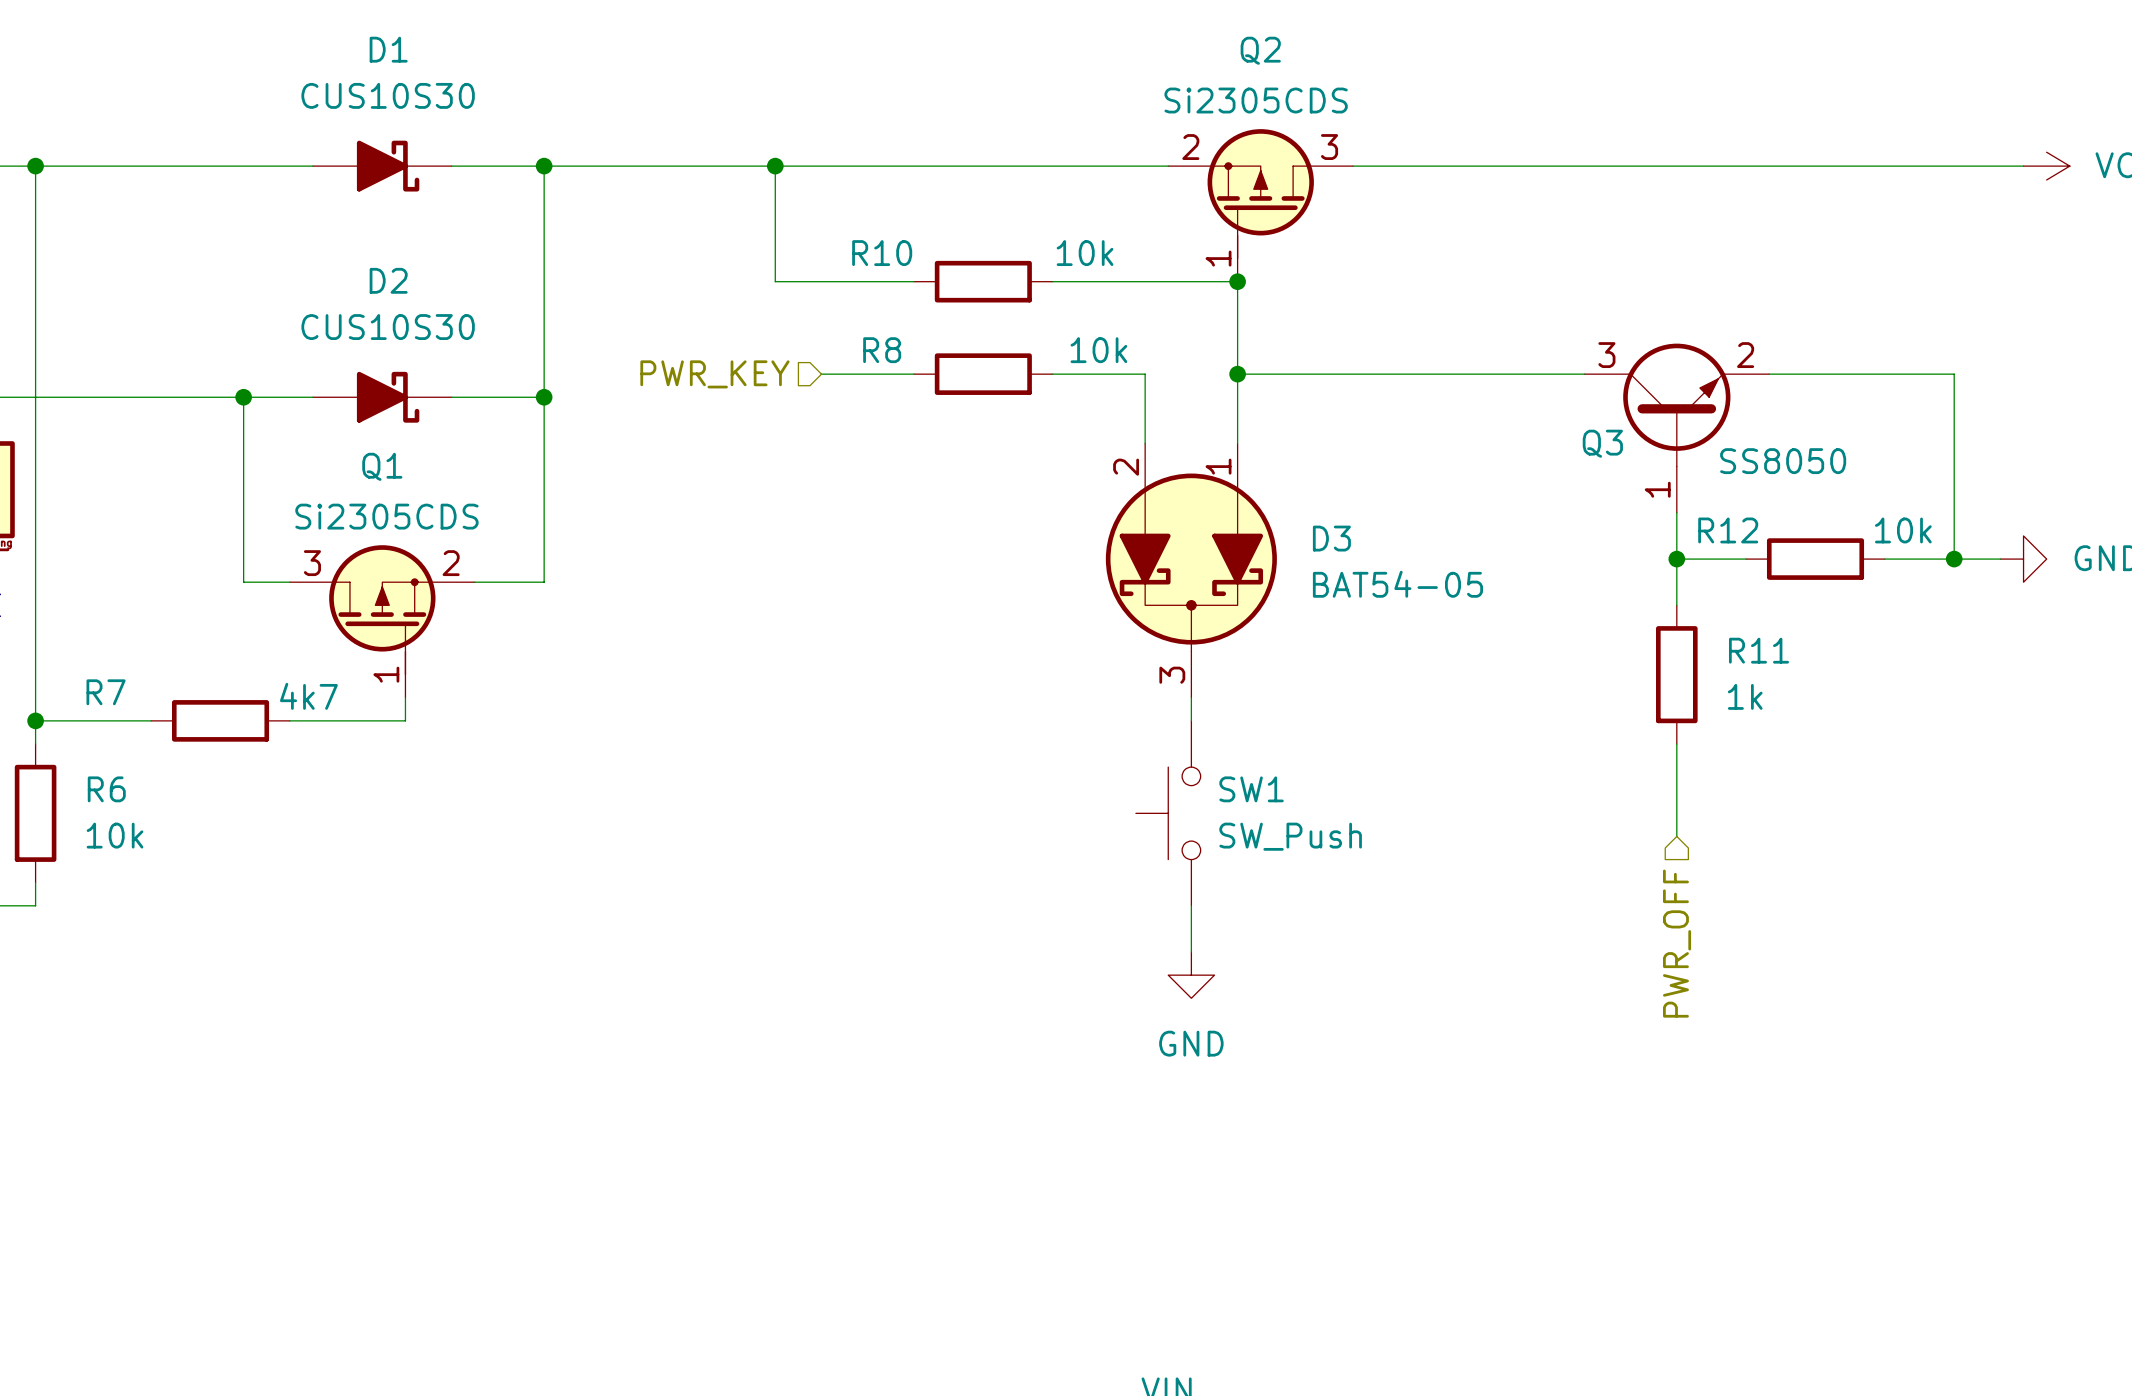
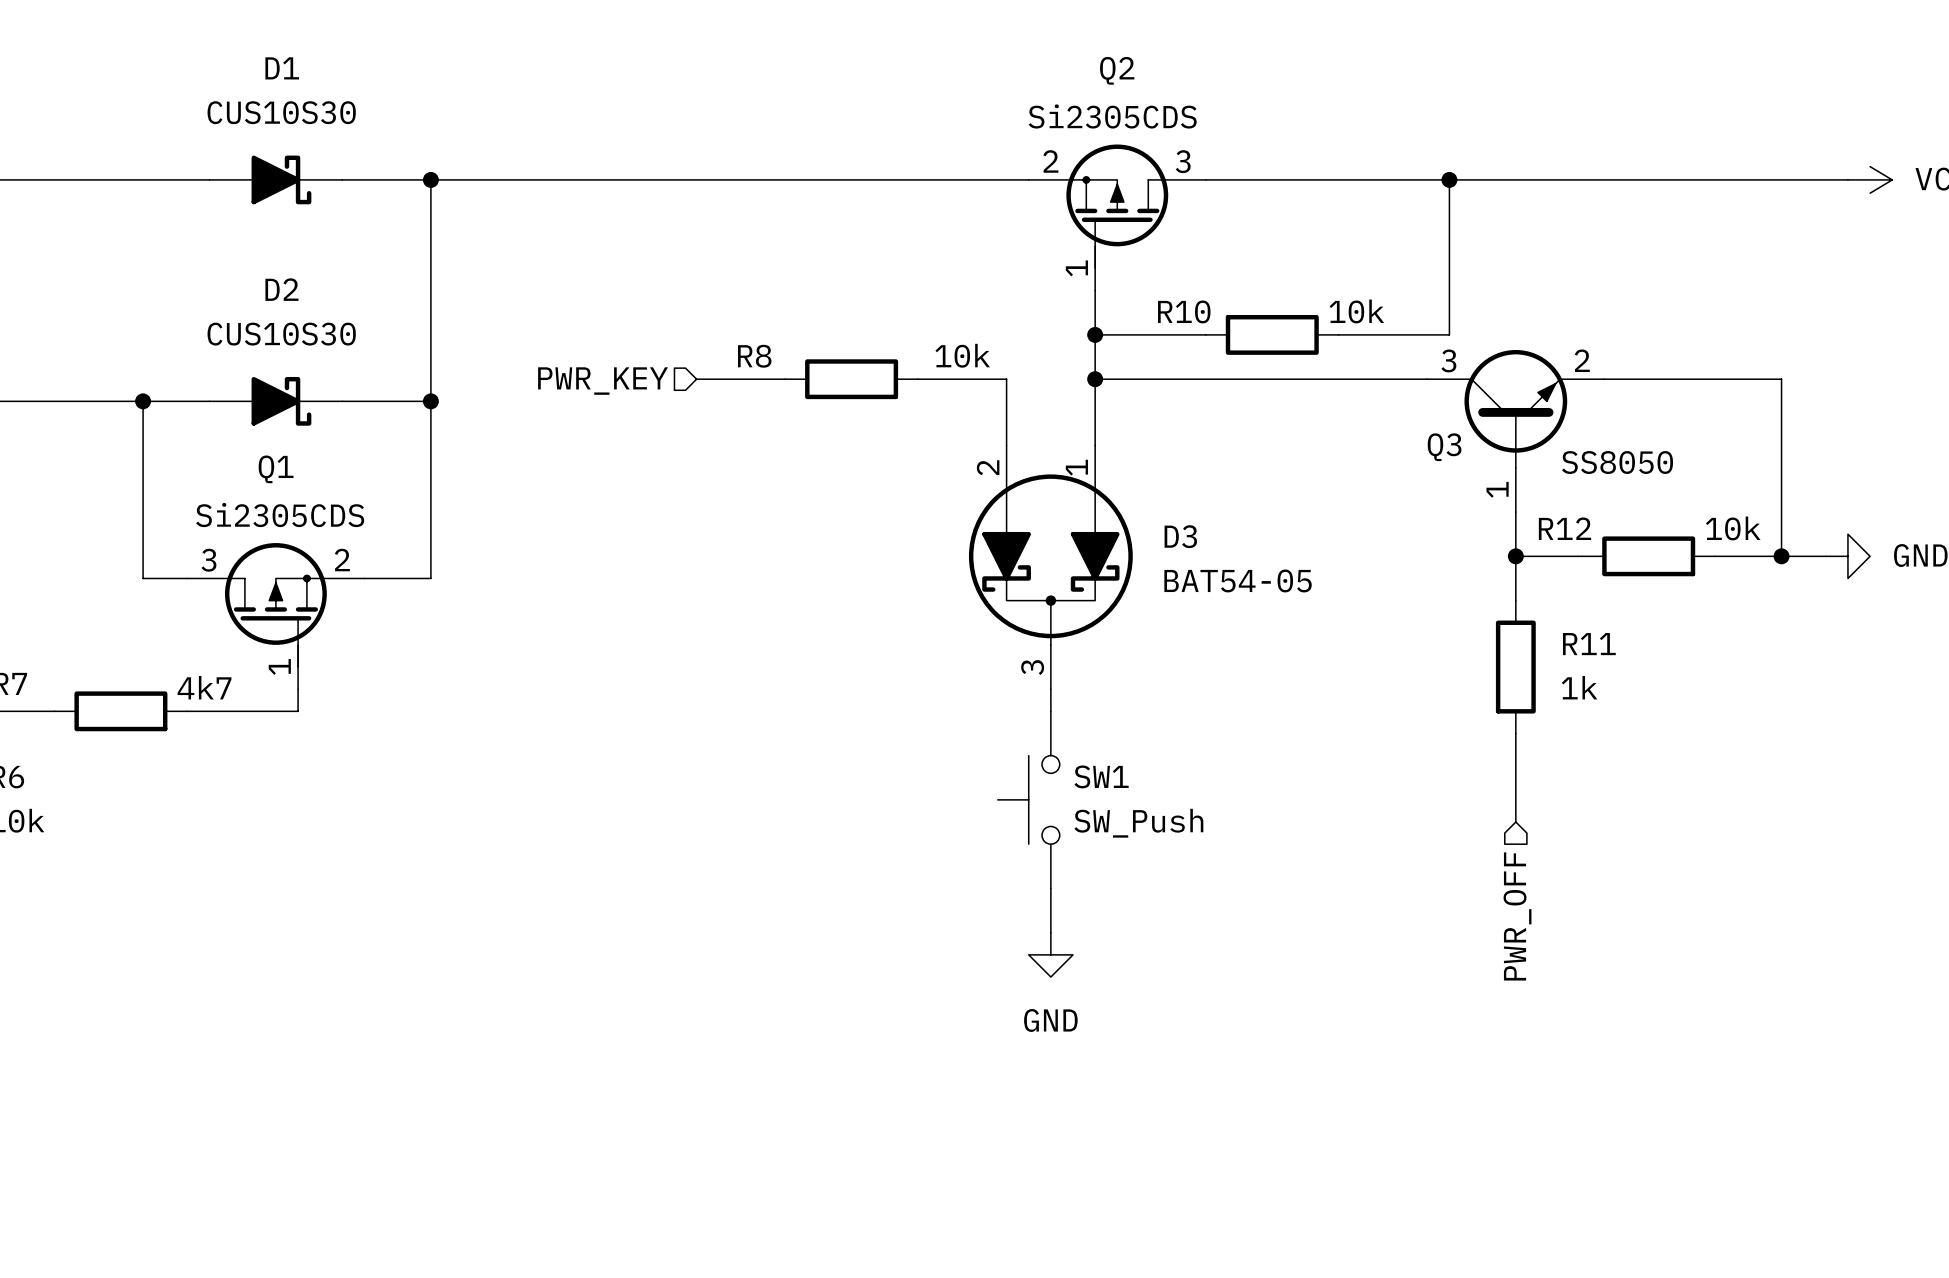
wire: (775, 166) (775, 281) (913, 281) -> none
junction: (775, 166) -> none
wire: none -> (1449, 179) (1449, 334) (1338, 334)
junction: none -> (1449, 179)
R10 name position: R10 (882, 253) -> R10 (1184, 311)
R10 value position: 10k (1085, 253) -> 10k (1356, 311)
R10 position: (983, 281) -> (1272, 334)
wire: (1052, 281) (1237, 281) -> none
junction position: (1237, 281) -> (1095, 334)
wire: none -> (1095, 334) (1205, 334)

